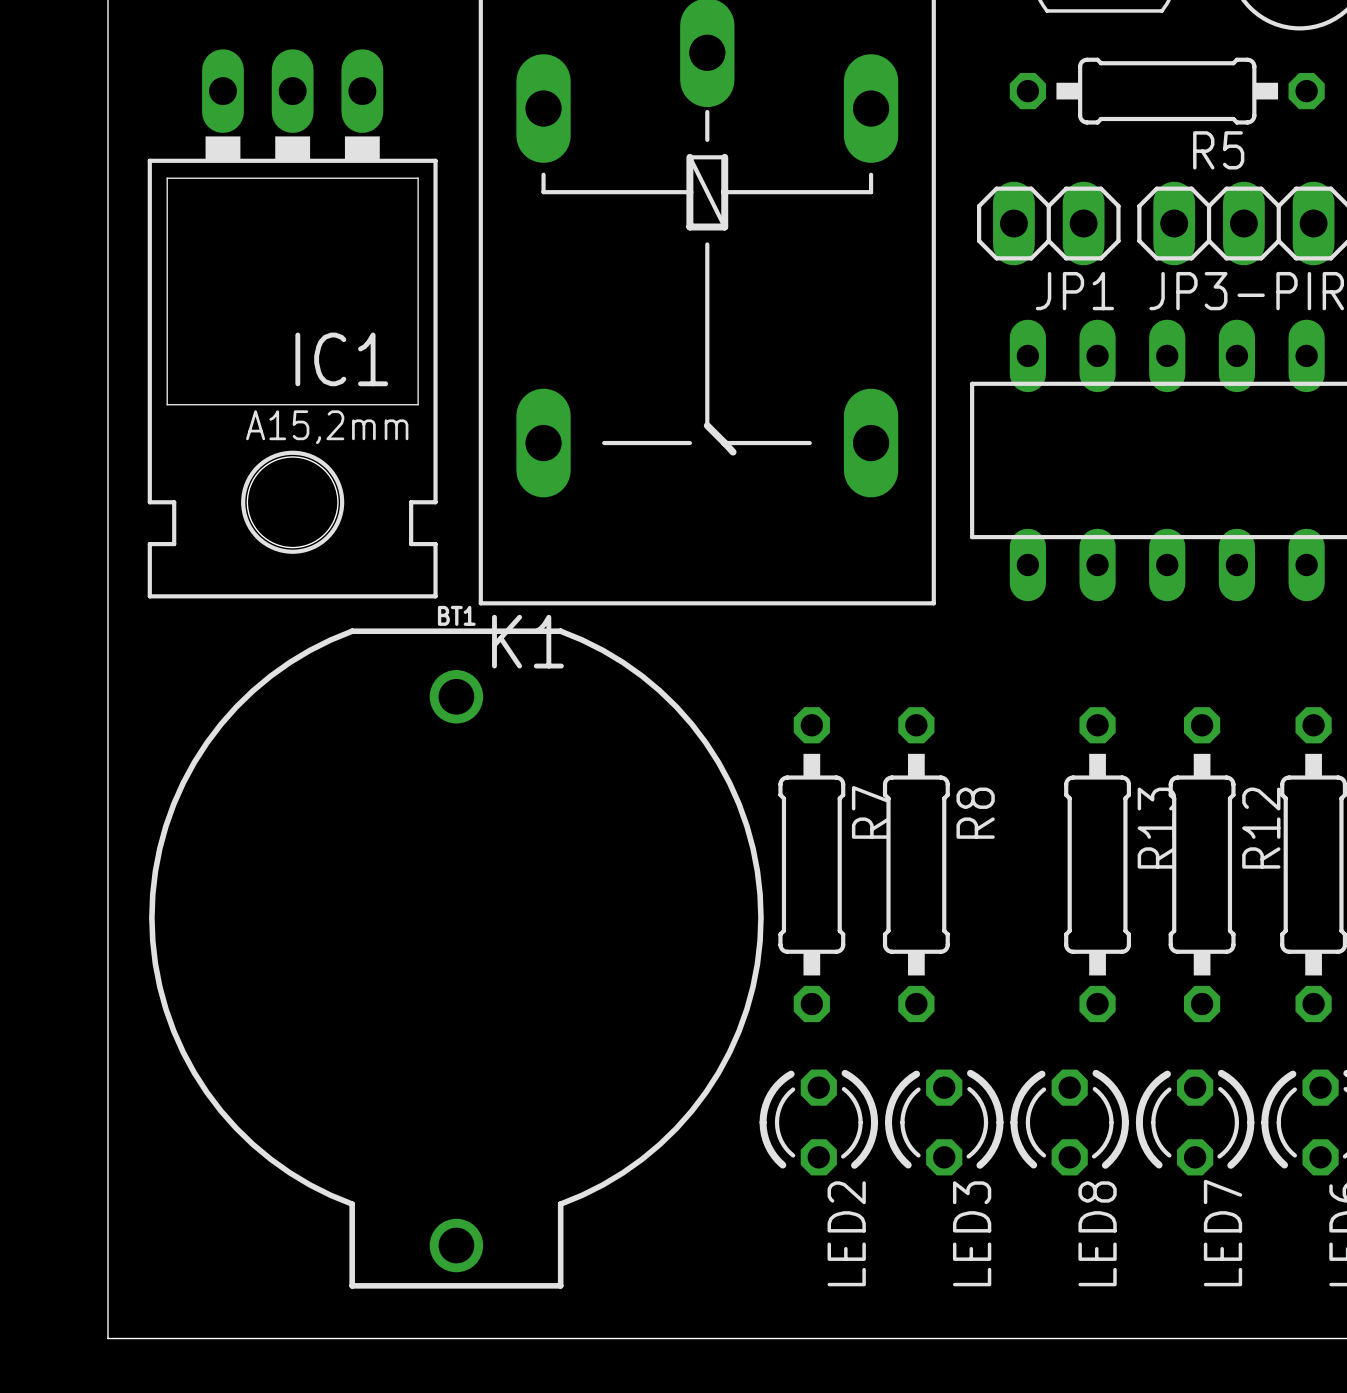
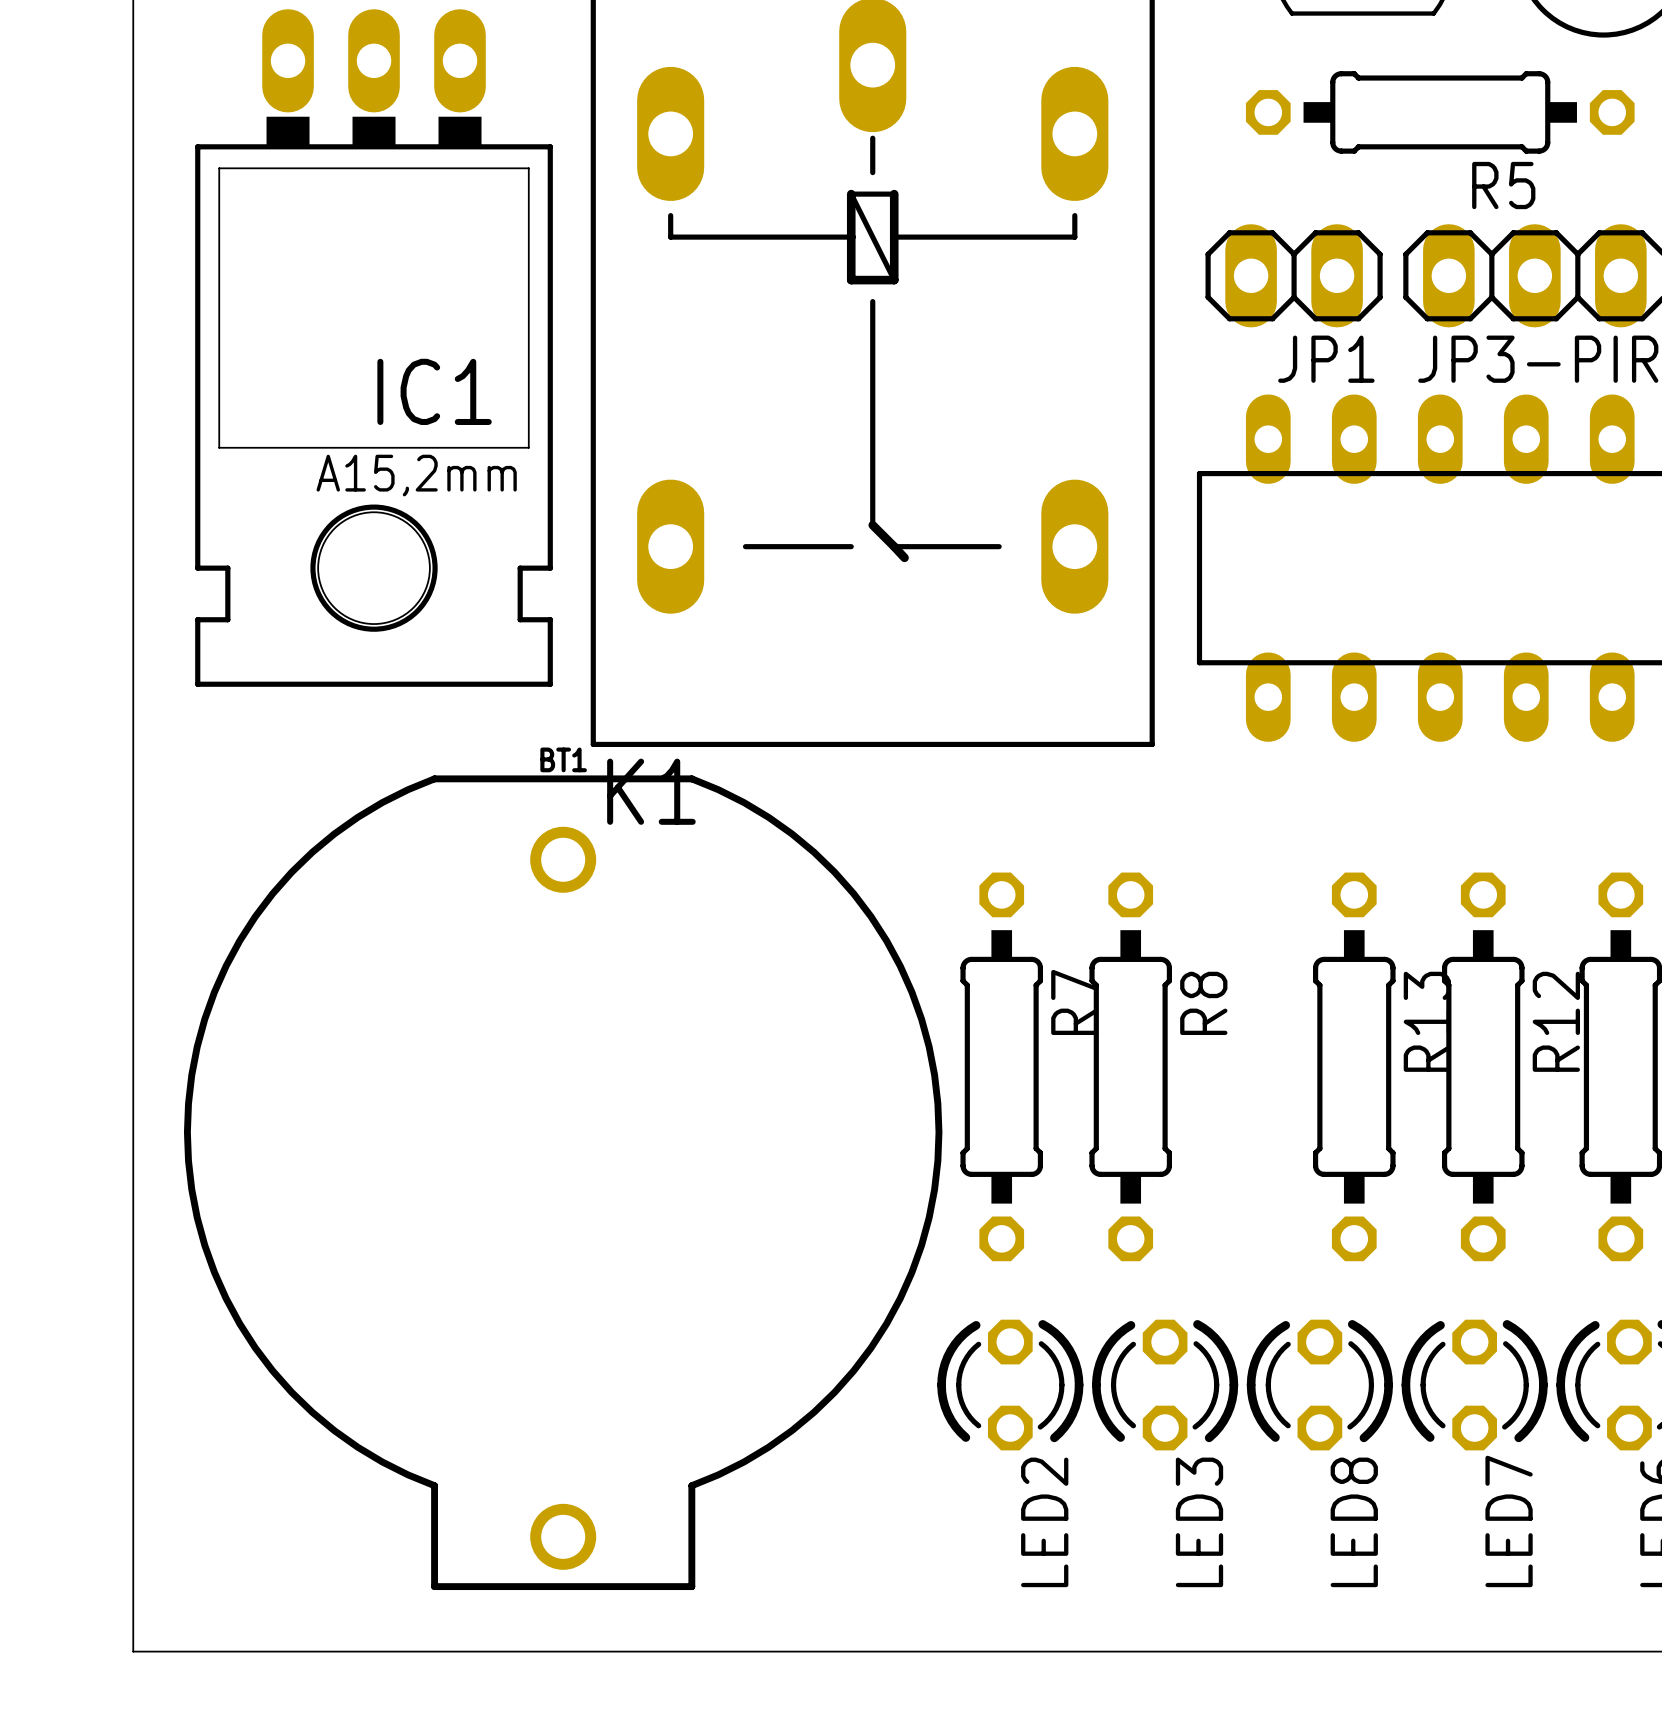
IC1 position: (292, 323) -> (374, 348)

